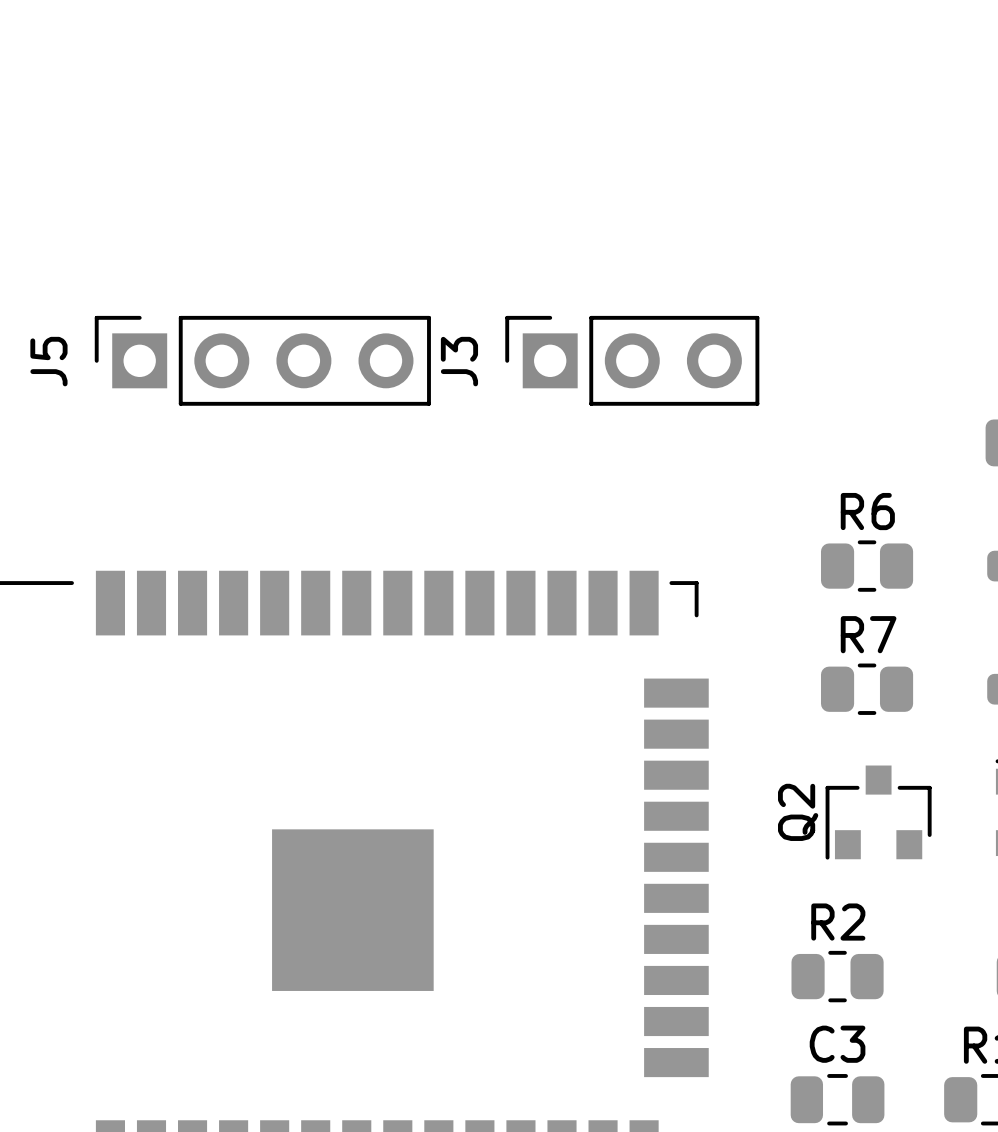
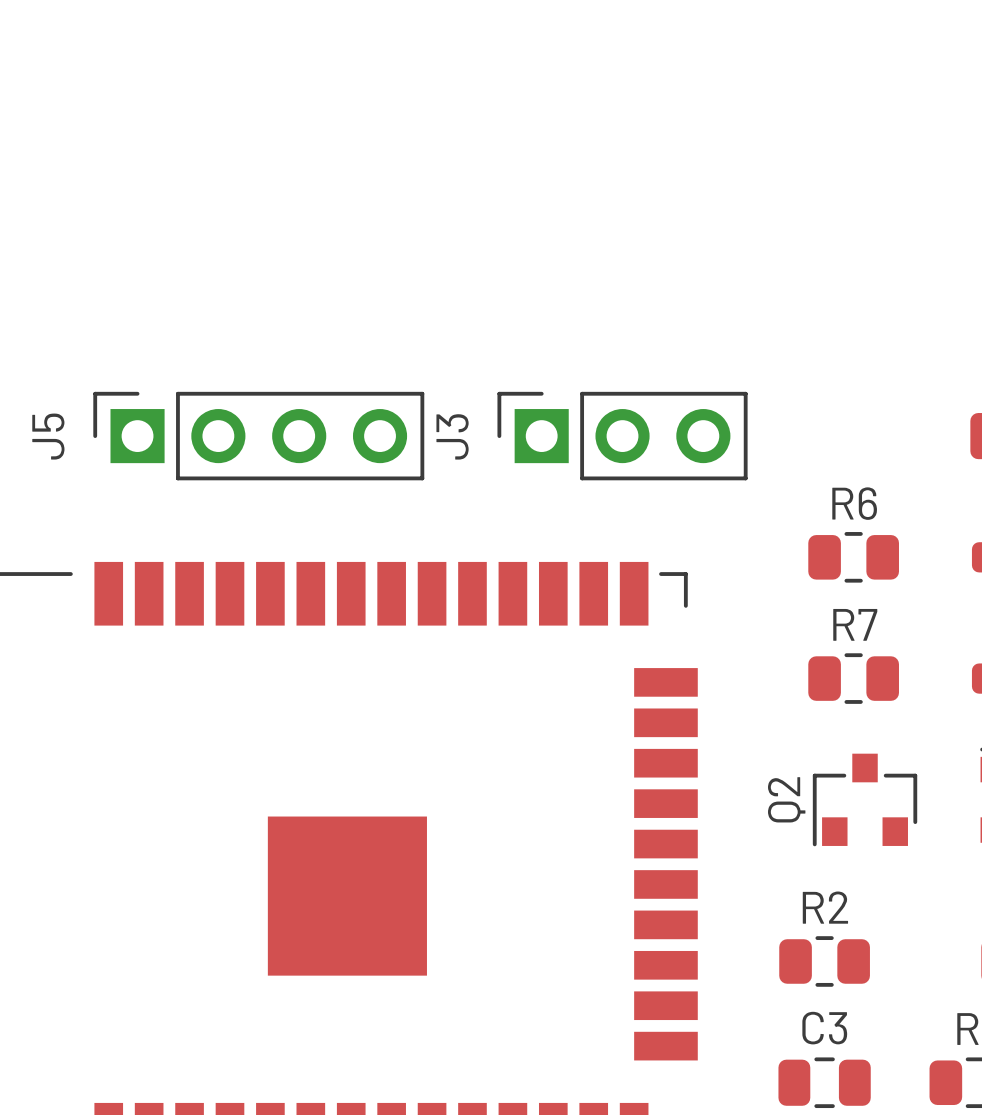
J5 position: (262, 360) -> (258, 436)
J3 position: (632, 360) -> (622, 436)

